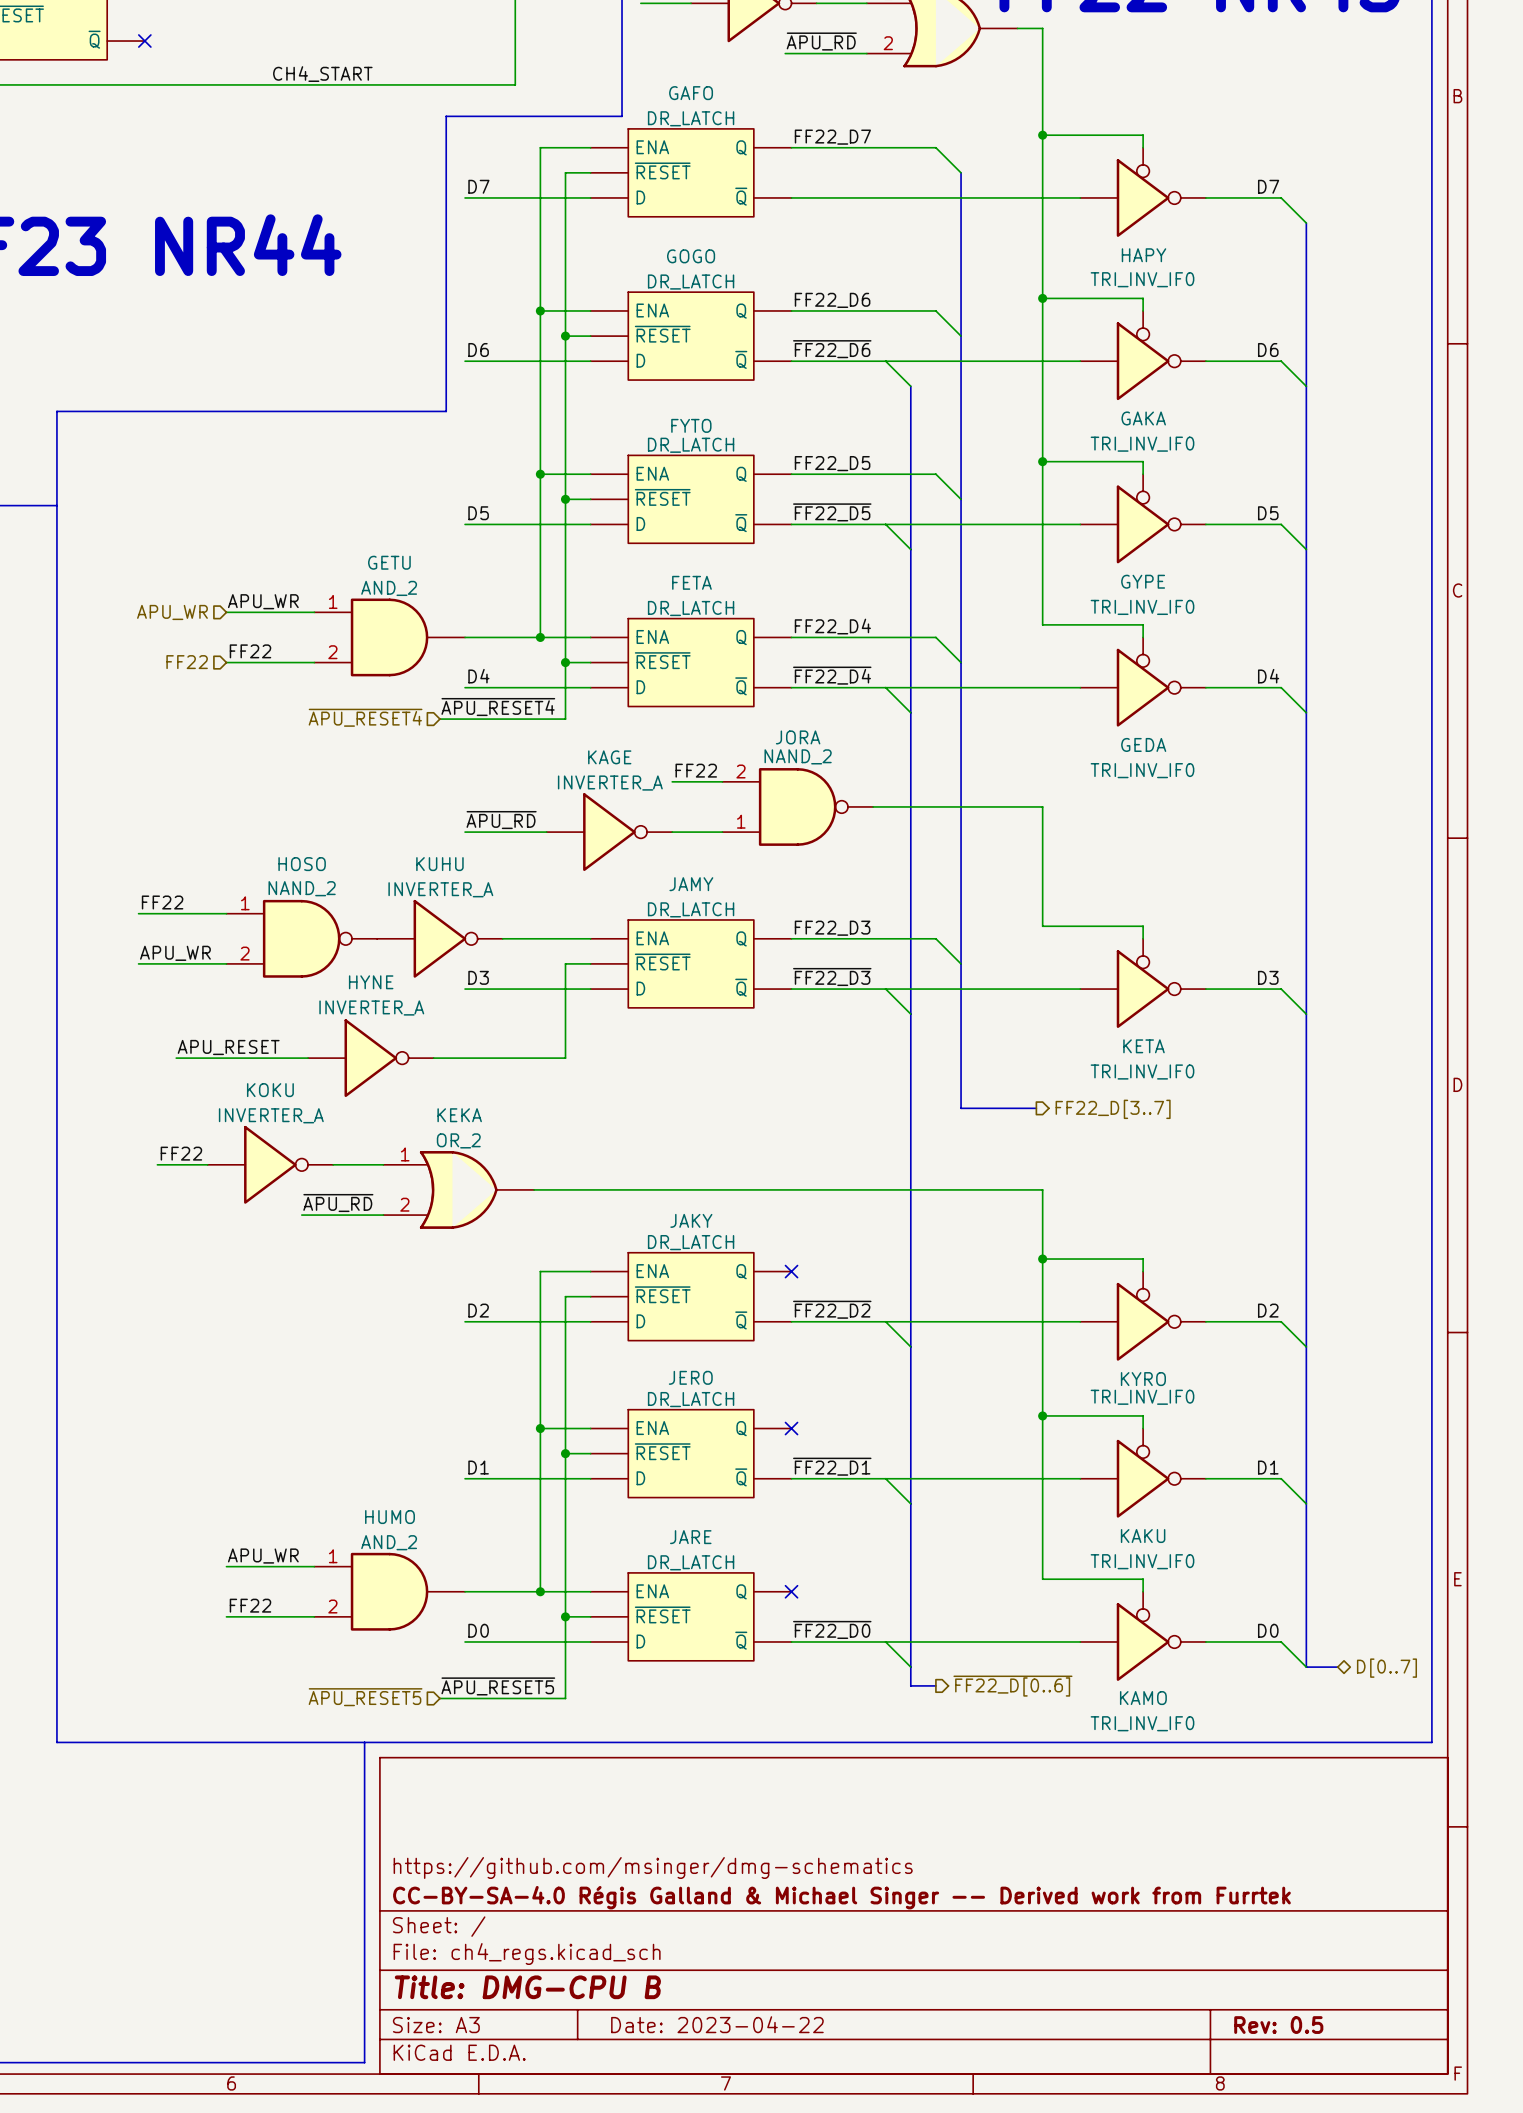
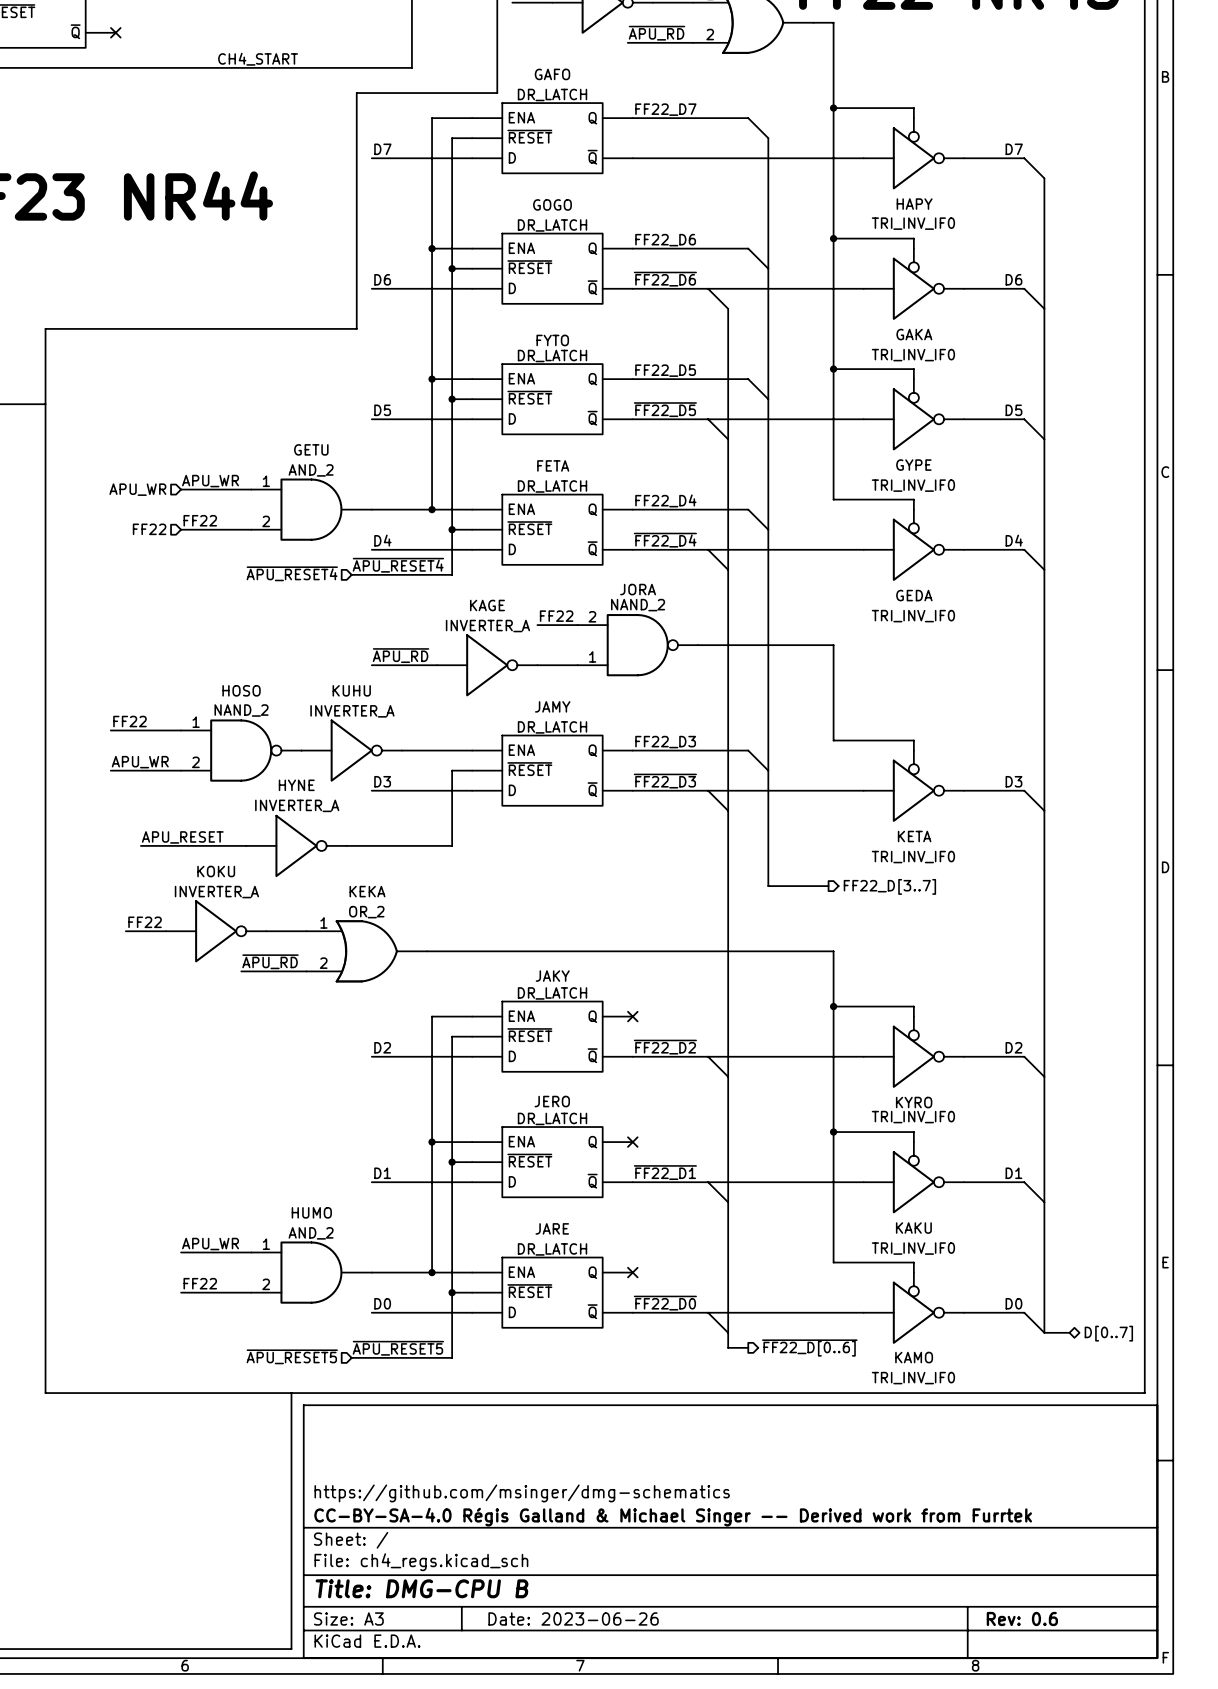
title block: Date: 2023-04-22 (717, 2024) -> Date: 2023-06-26 (573, 1618)
title block: Rev: 0.5 (1278, 2025) -> Rev: 0.6 (1022, 1618)

